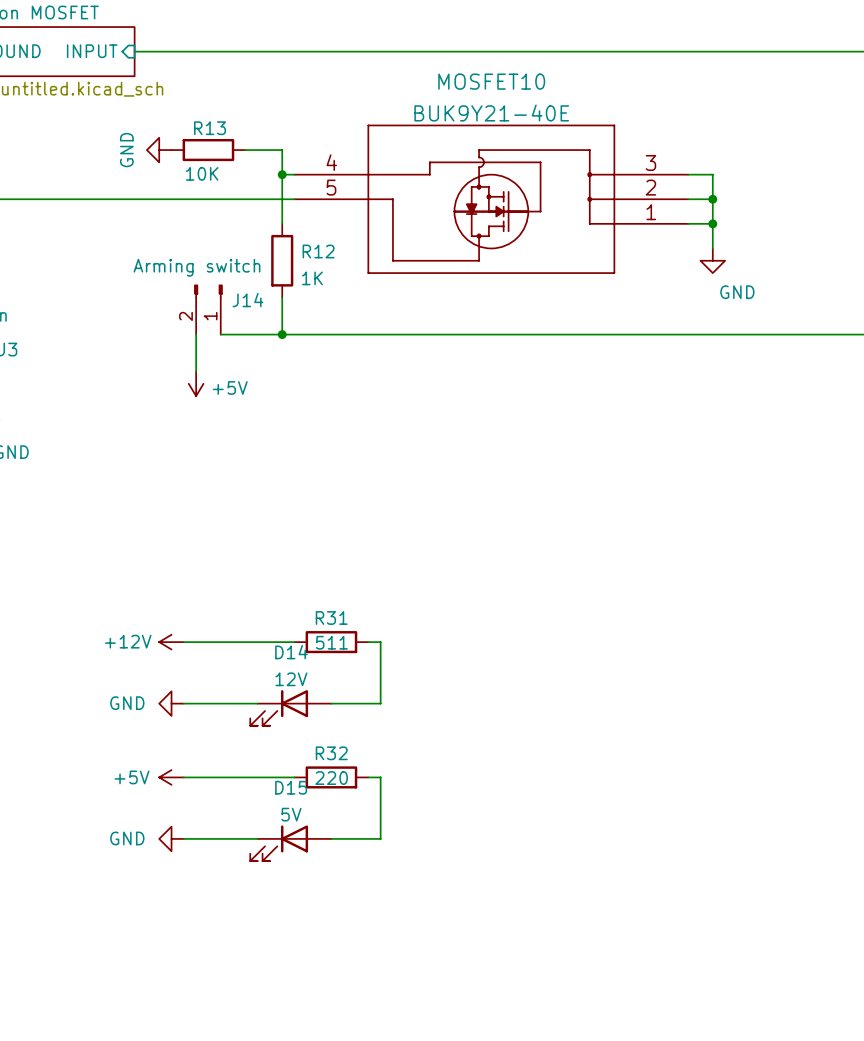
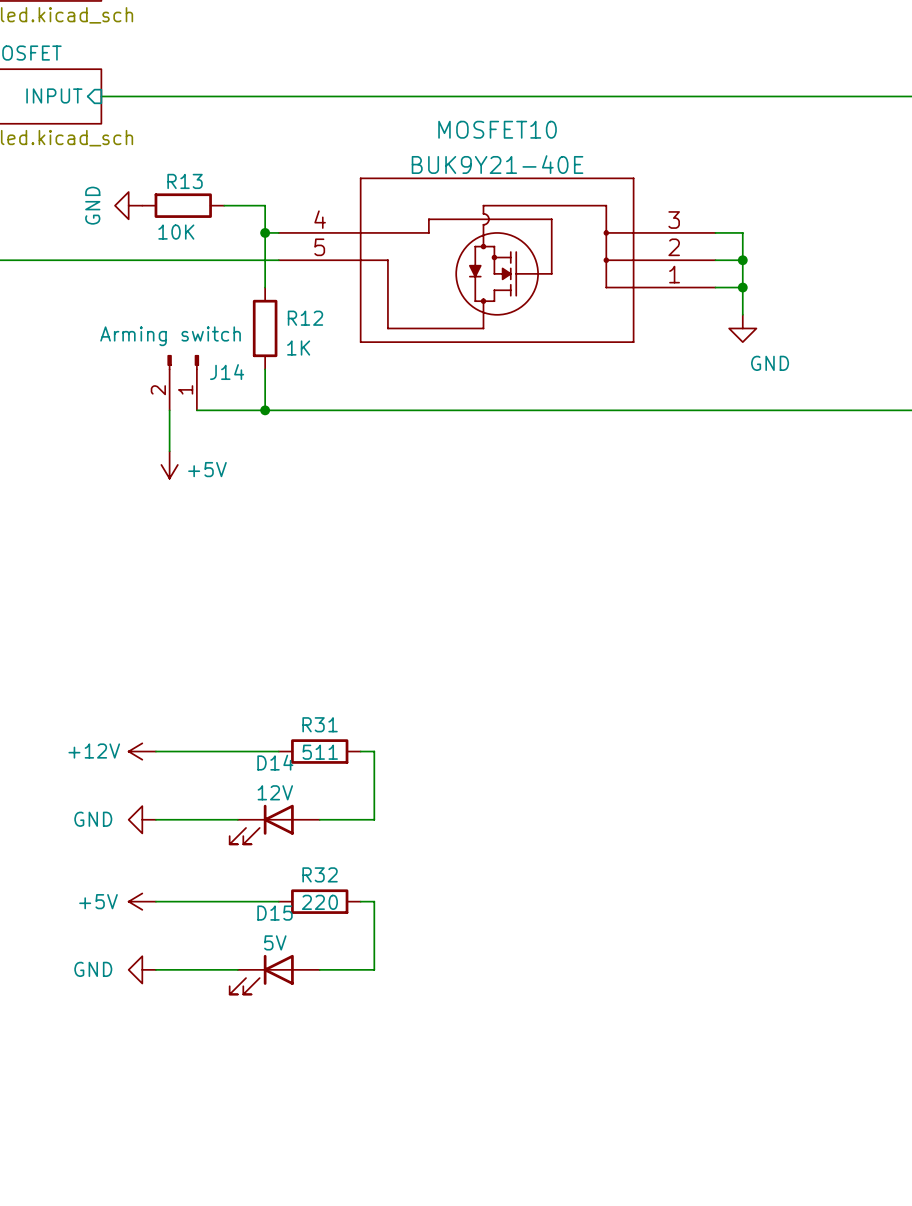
MOSFET10 symbol: [294, 124, 689, 274] -> [278, 177, 716, 343]

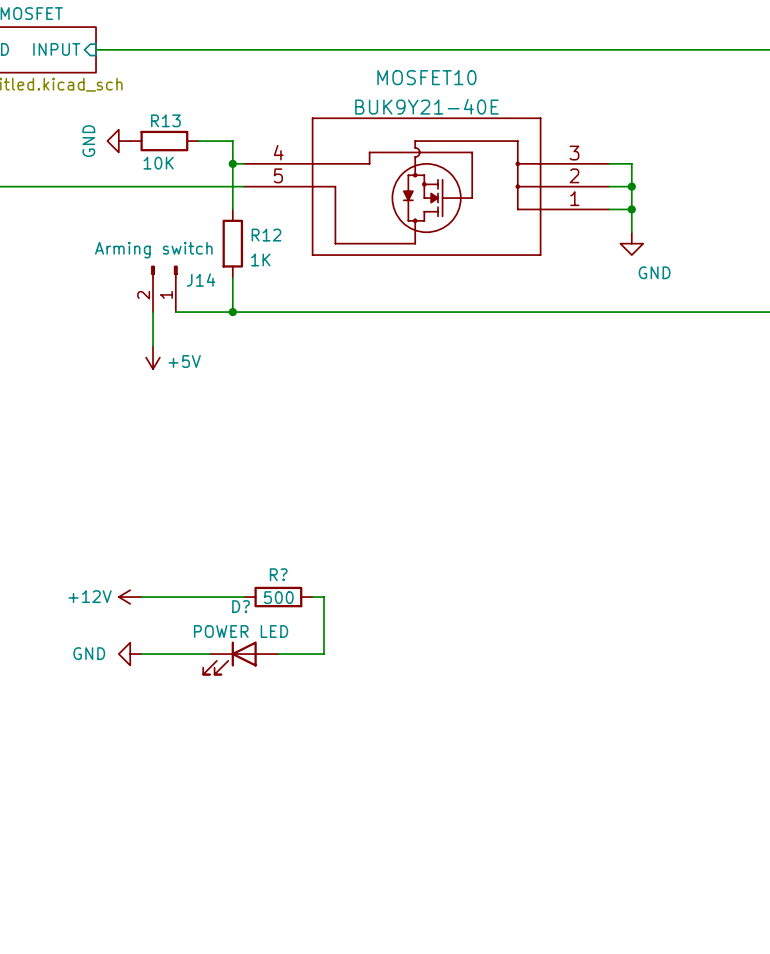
R31 name: R31 (320, 724) -> R? (278, 574)
R31 value: 511 (320, 752) -> 500 (278, 597)
D14 name: D14 (275, 762) -> D? (241, 606)
D14 value: 12V (275, 792) -> POWER LED (241, 631)
power symbol: +5V (142, 901) -> none
wire: (155, 901) (278, 901) -> none
R32: 220 (319, 901) -> none
wire: (360, 901) (374, 901) (374, 969) (319, 969) -> none
power symbol: GND (142, 969) -> none
wire: (155, 969) (237, 969) -> none
D15: 5V (274, 974) -> none

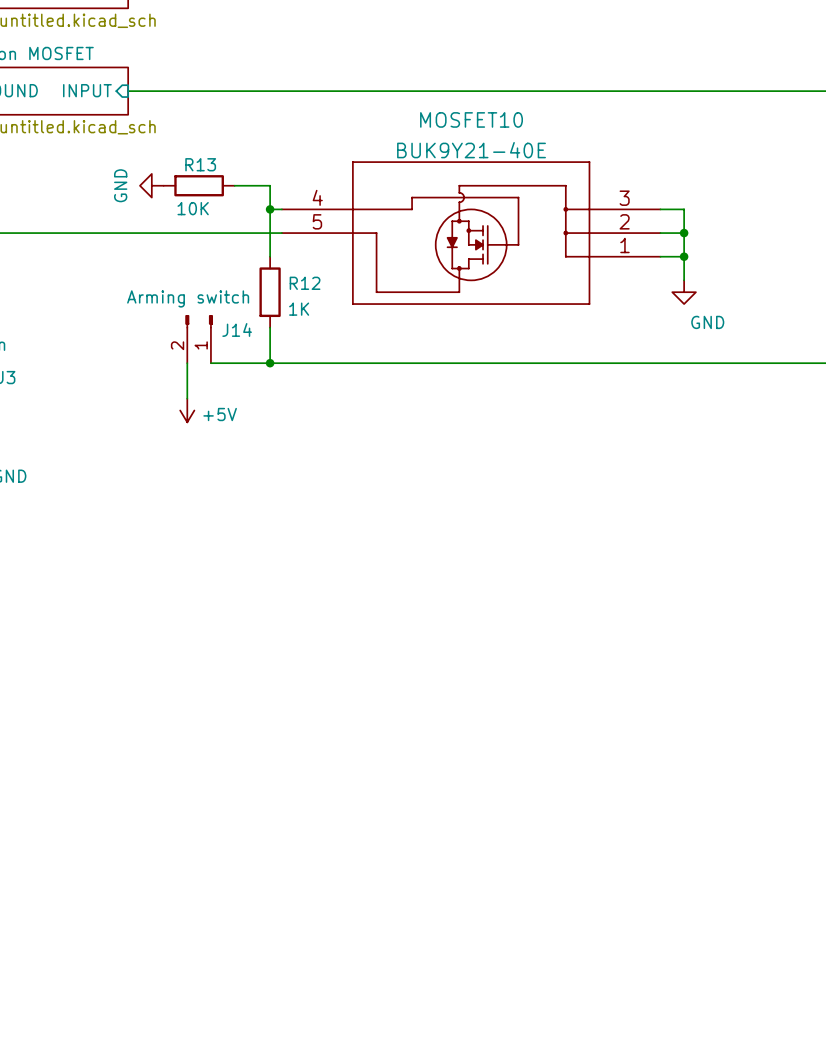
power symbol: +12V (130, 597) -> none
wire: (141, 597) (244, 597) -> none
R?: 500 (278, 597) -> none
wire: (312, 597) (324, 597) (324, 654) (278, 654) -> none
power symbol: GND (130, 654) -> none
wire: (141, 654) (210, 654) -> none
D?: POWER LED (240, 658) -> none

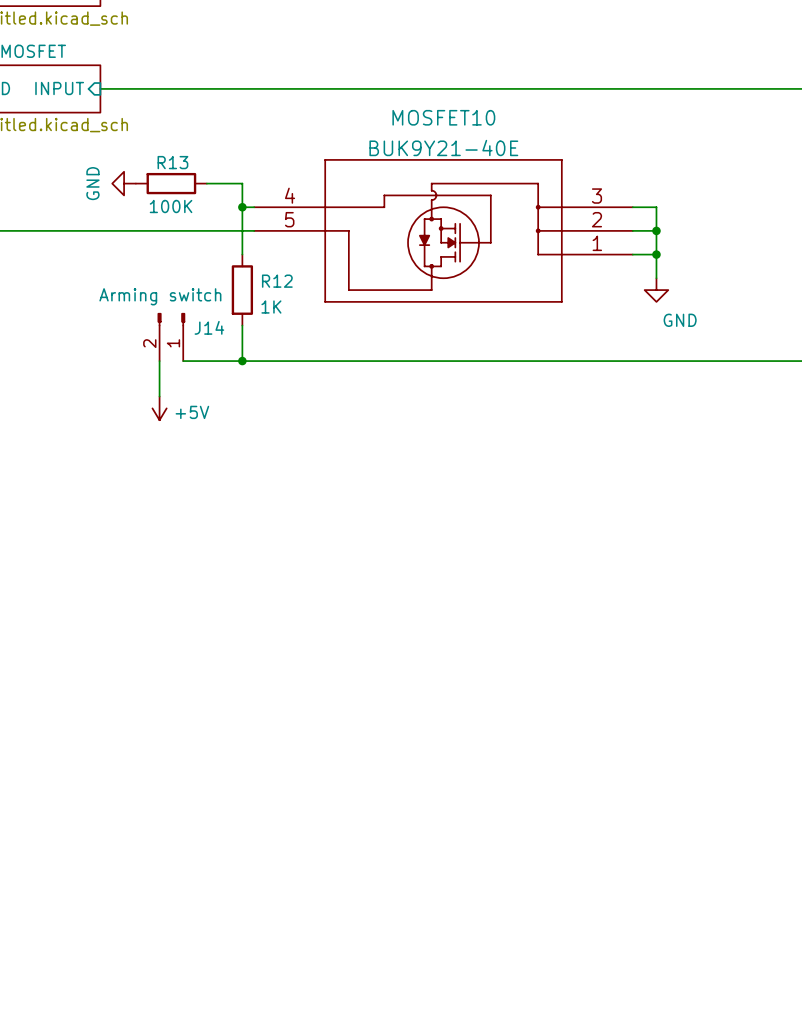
R13 value: 10K (193, 208) -> 100K (171, 206)

